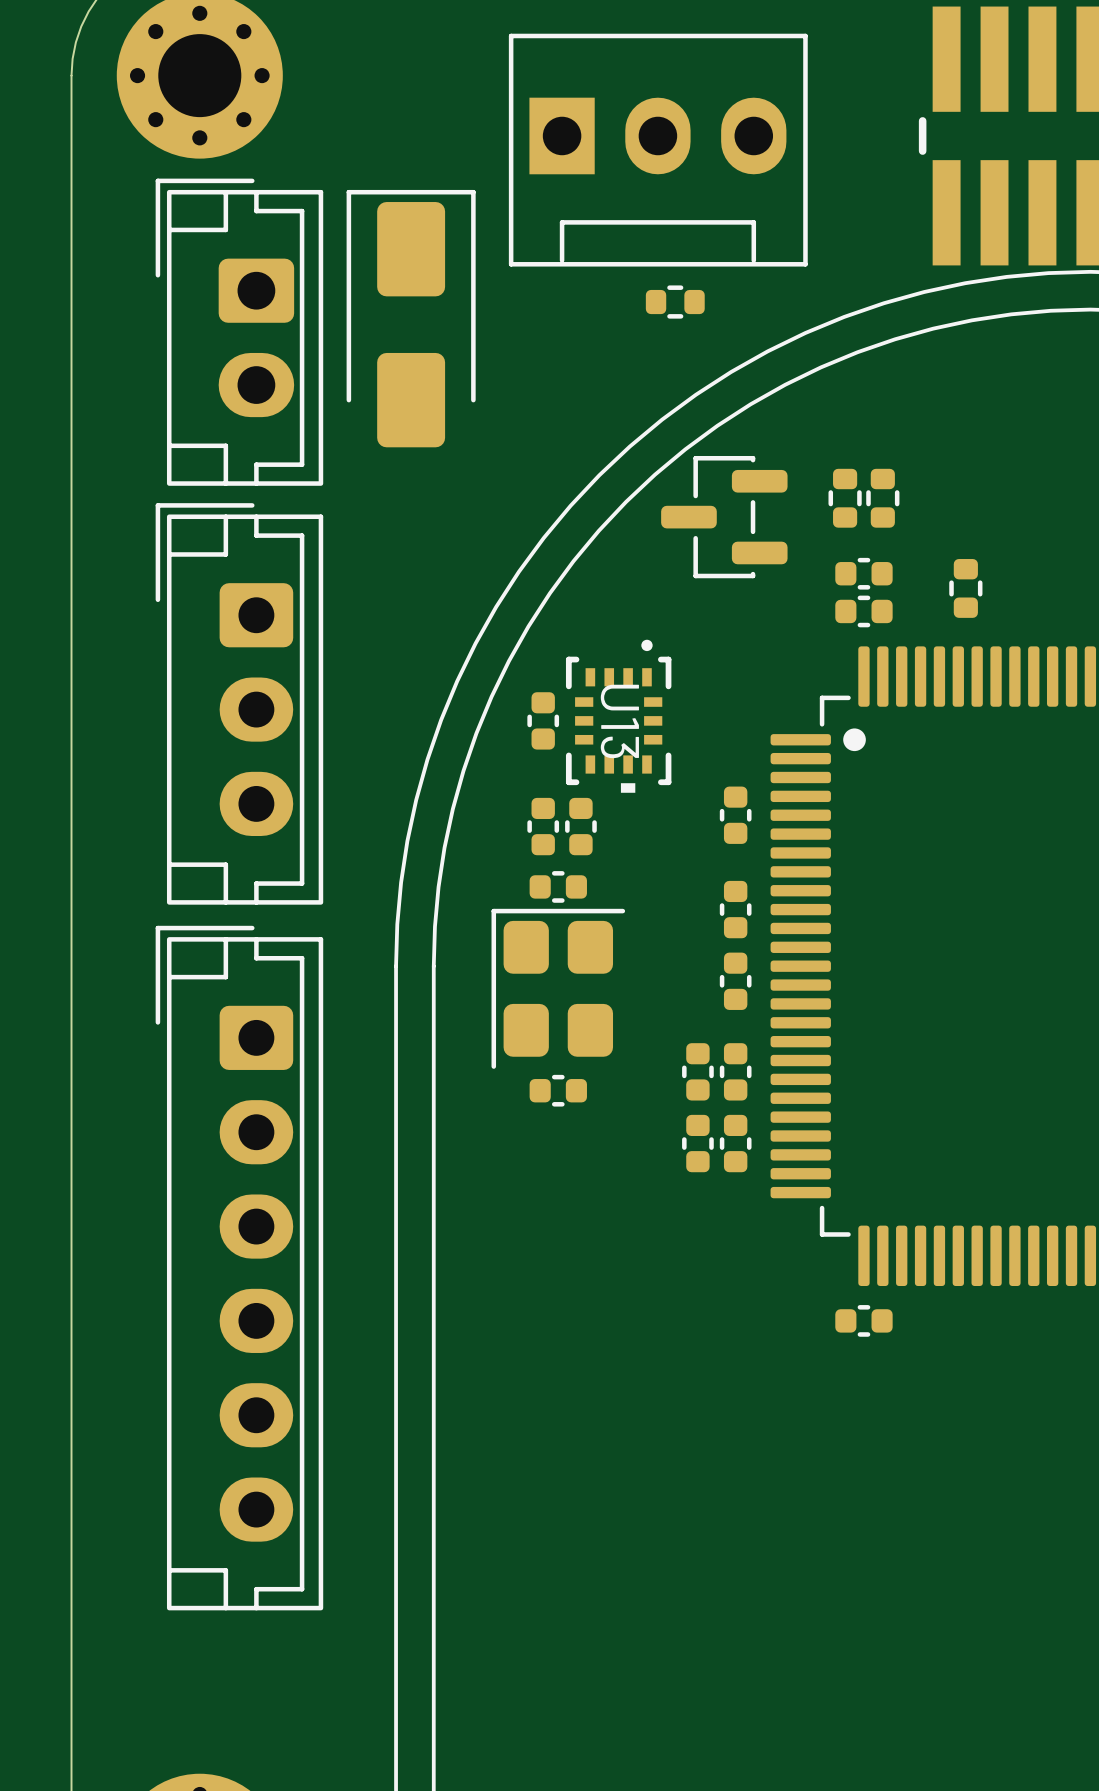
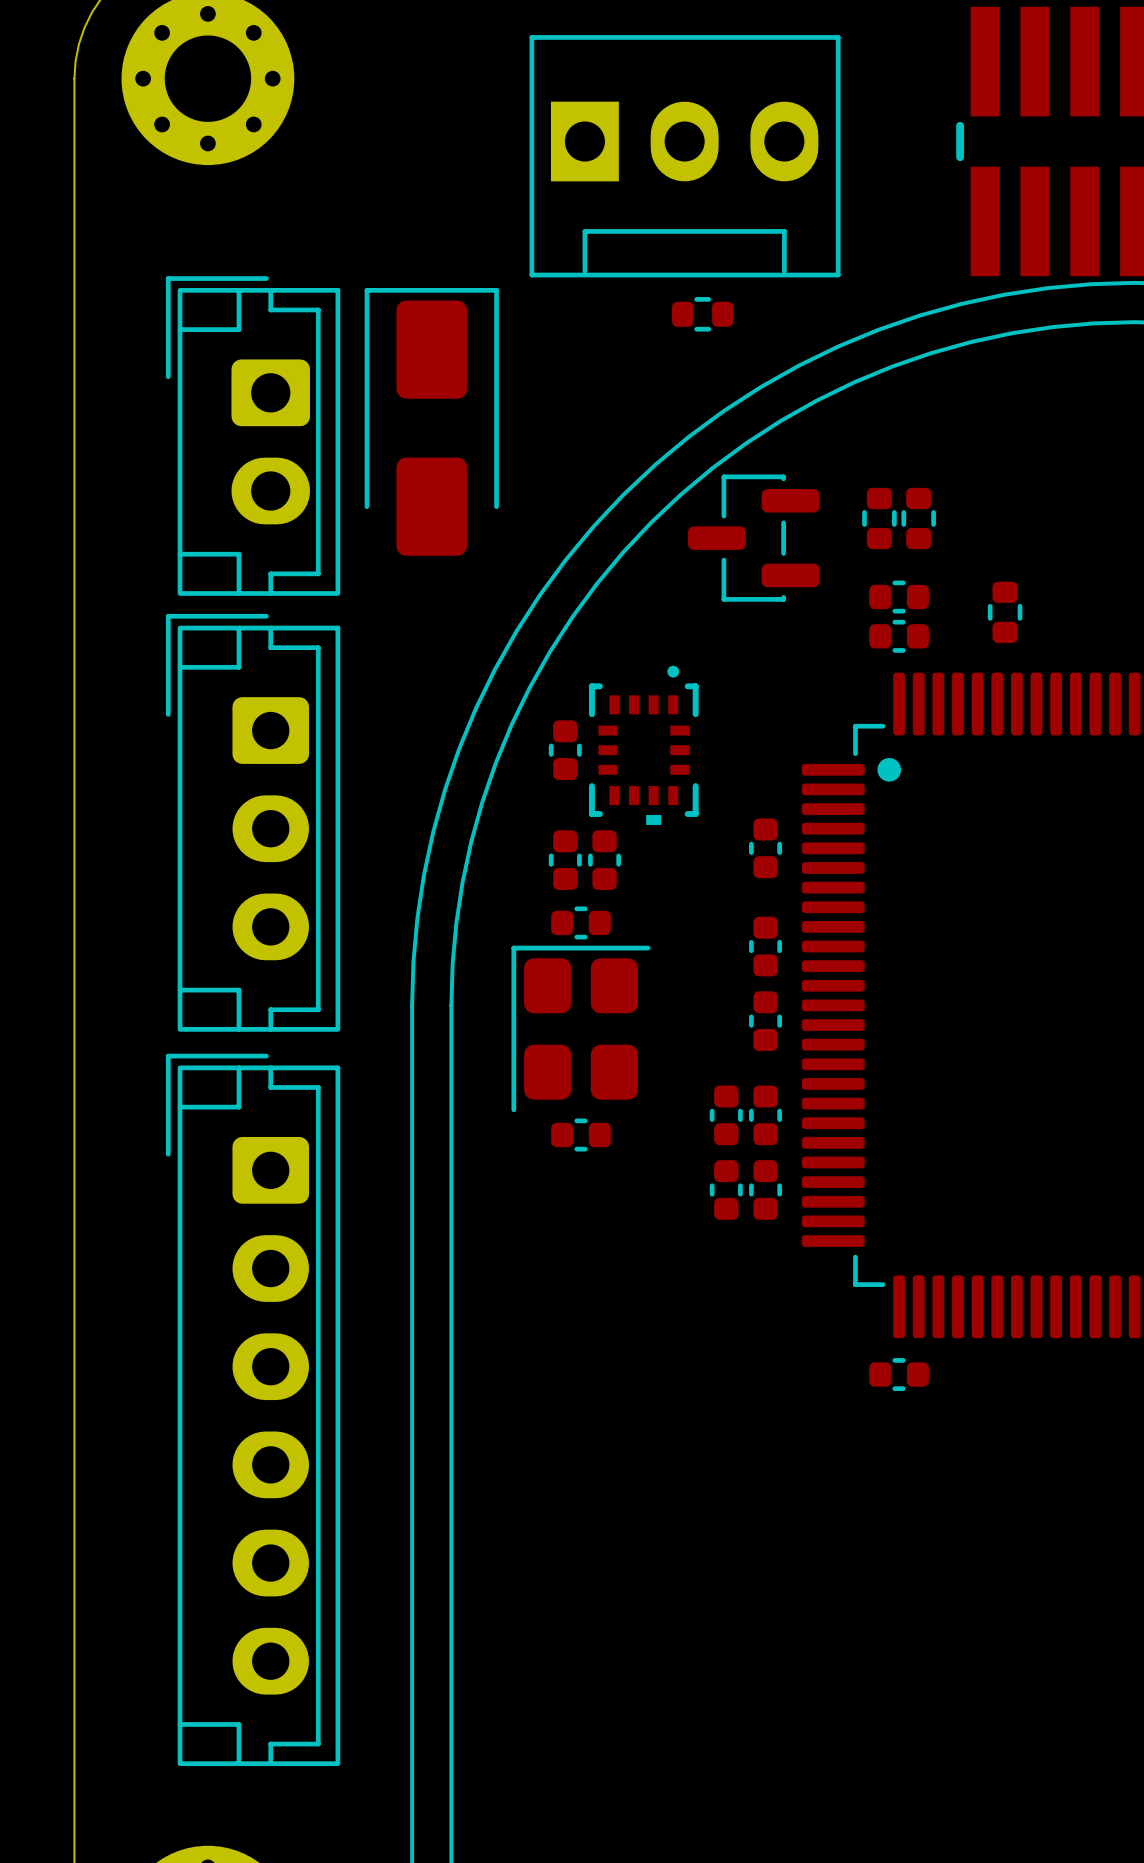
part position: (411, 318) -> (431, 421)
part position: (239, 332) -> (253, 436)
part position: (239, 703) -> (253, 822)
U13 name: U13 (619, 721) -> none
part position: (239, 1268) -> (253, 1409)

